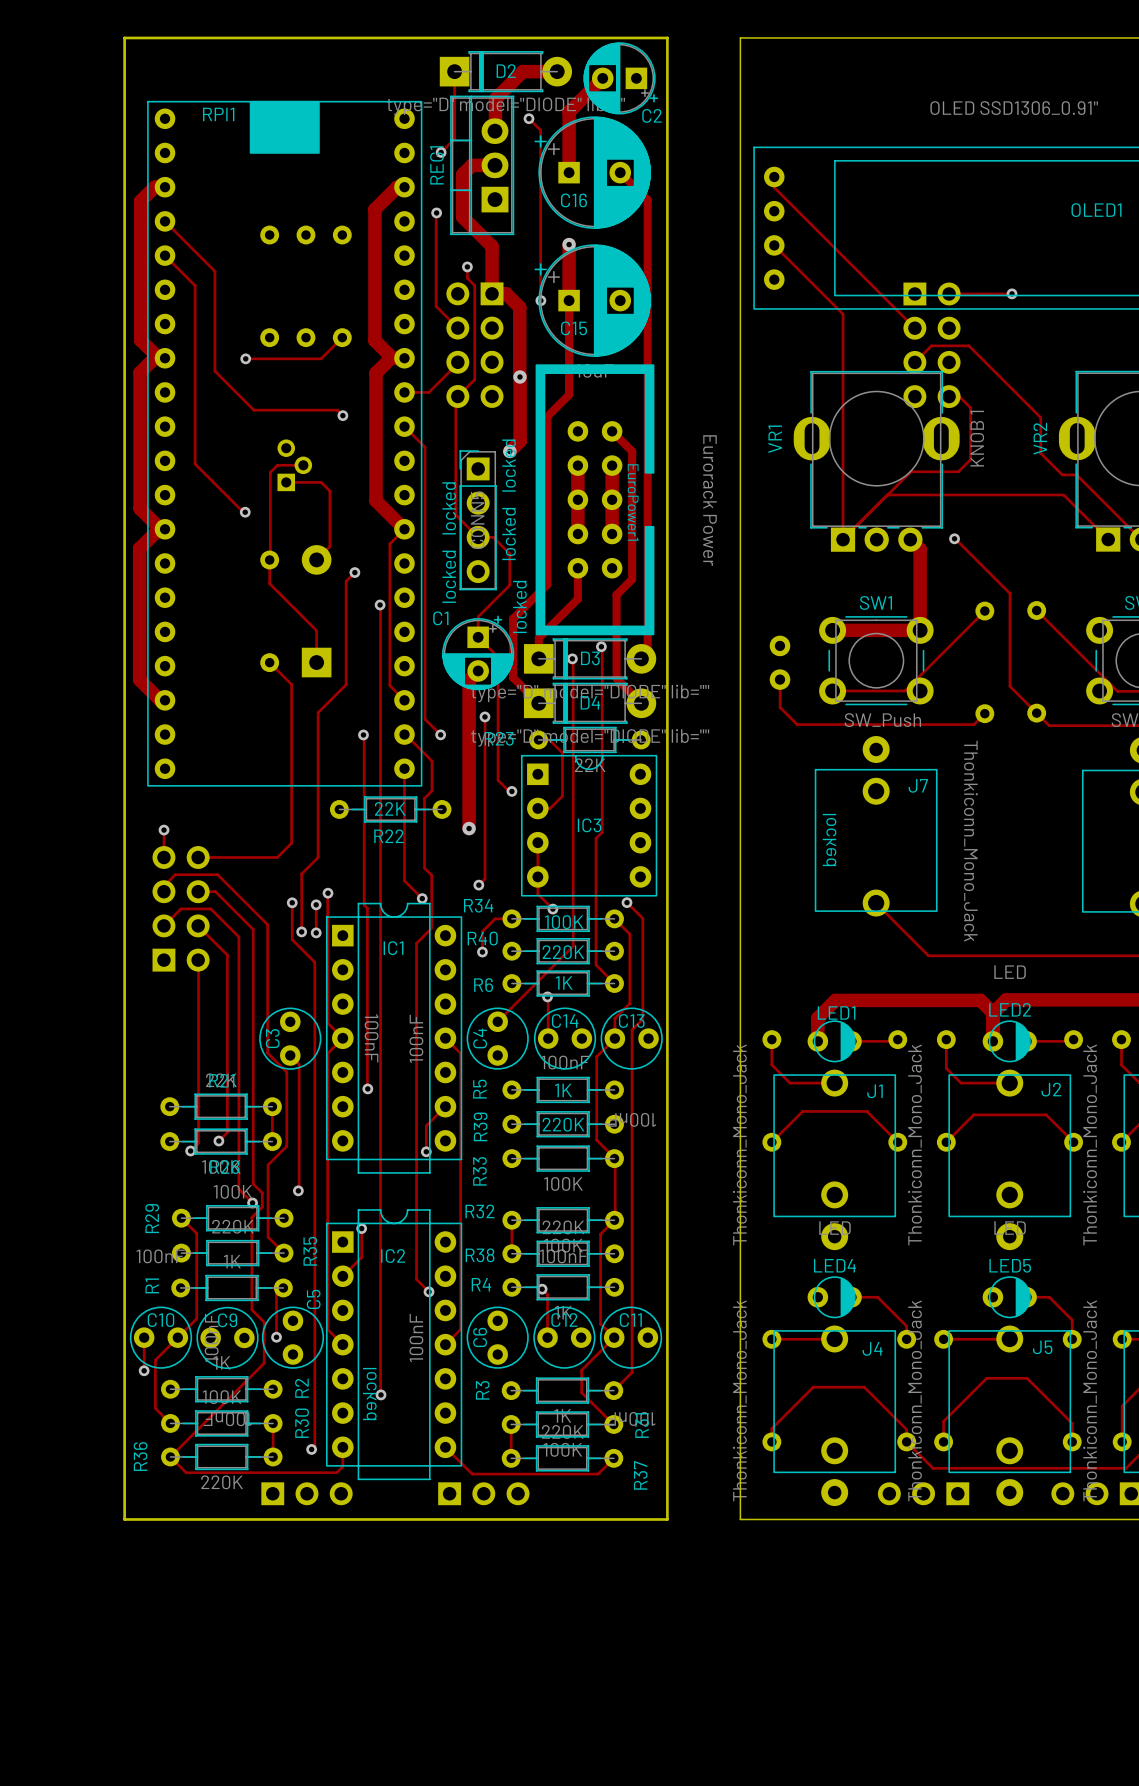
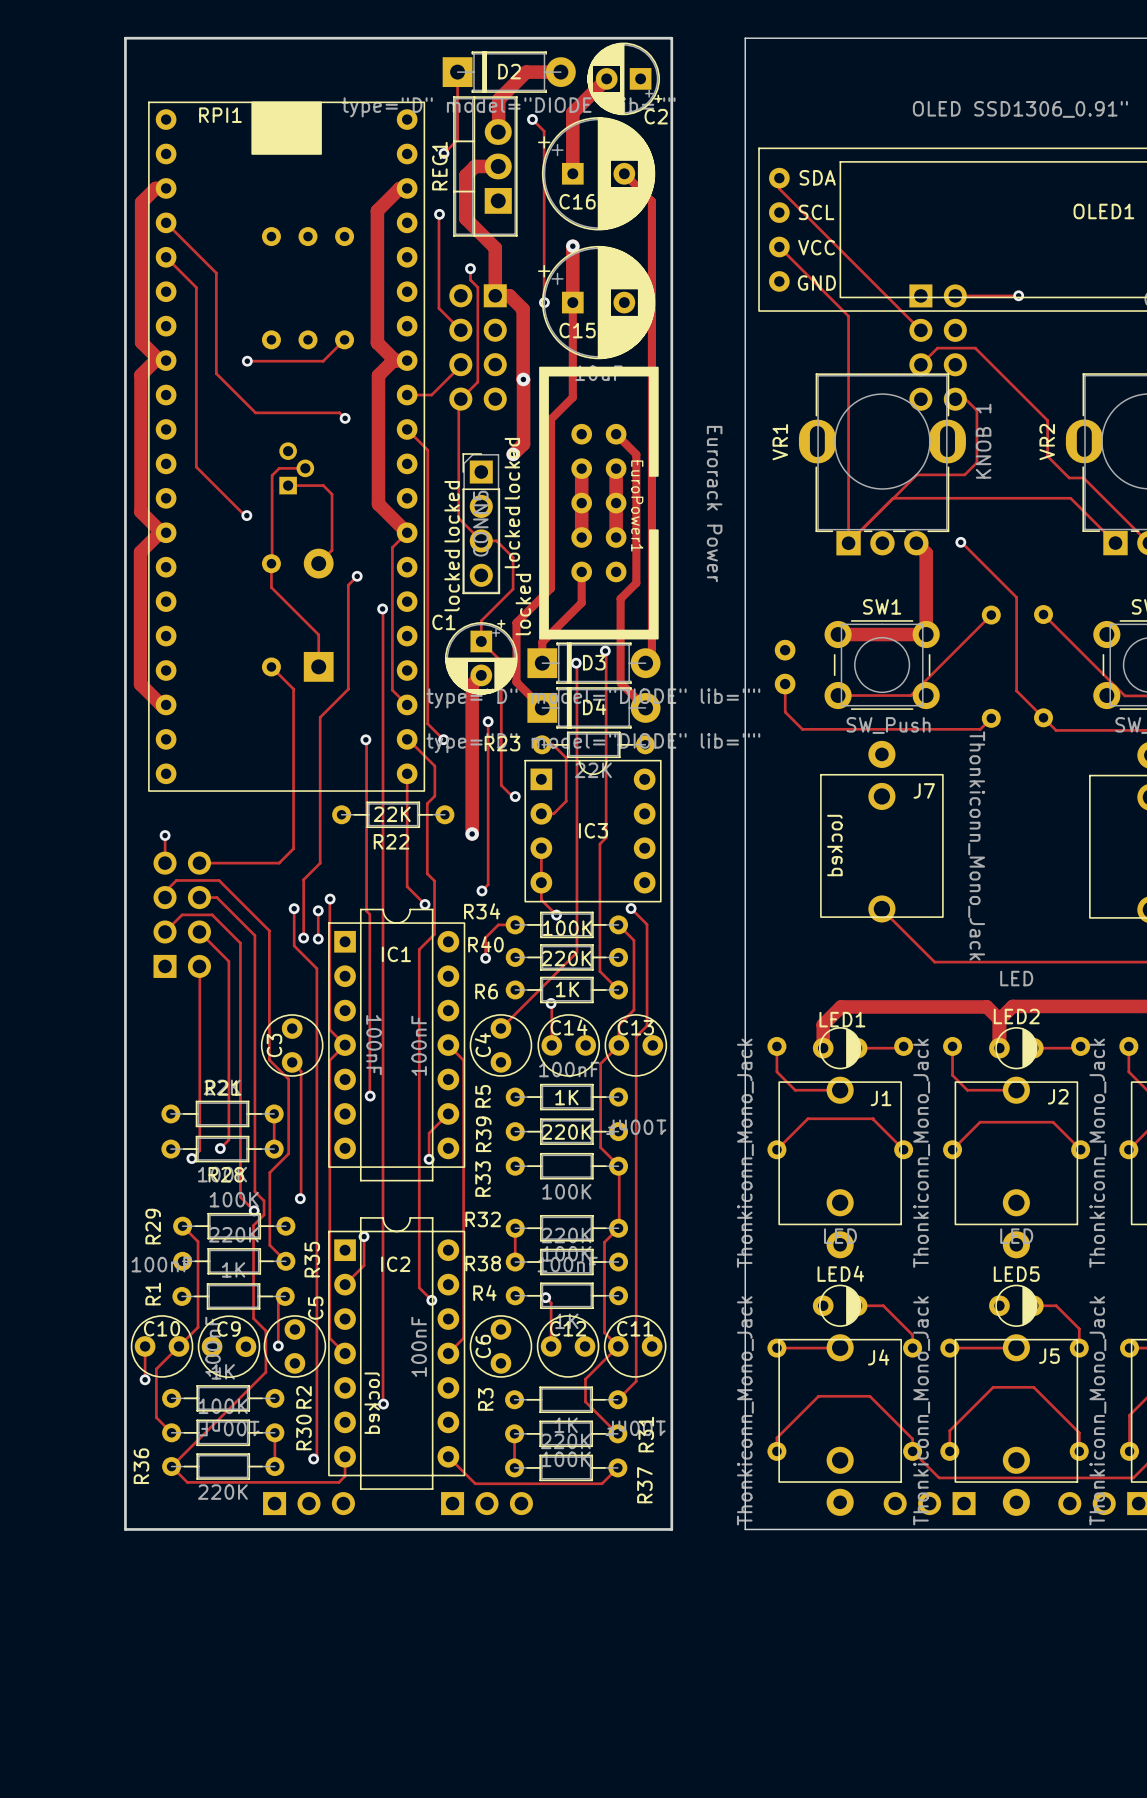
text: none -> SDA (817, 177)
text: none -> SCL (816, 212)
text: none -> VCC (816, 247)
text: none -> GND (816, 283)

